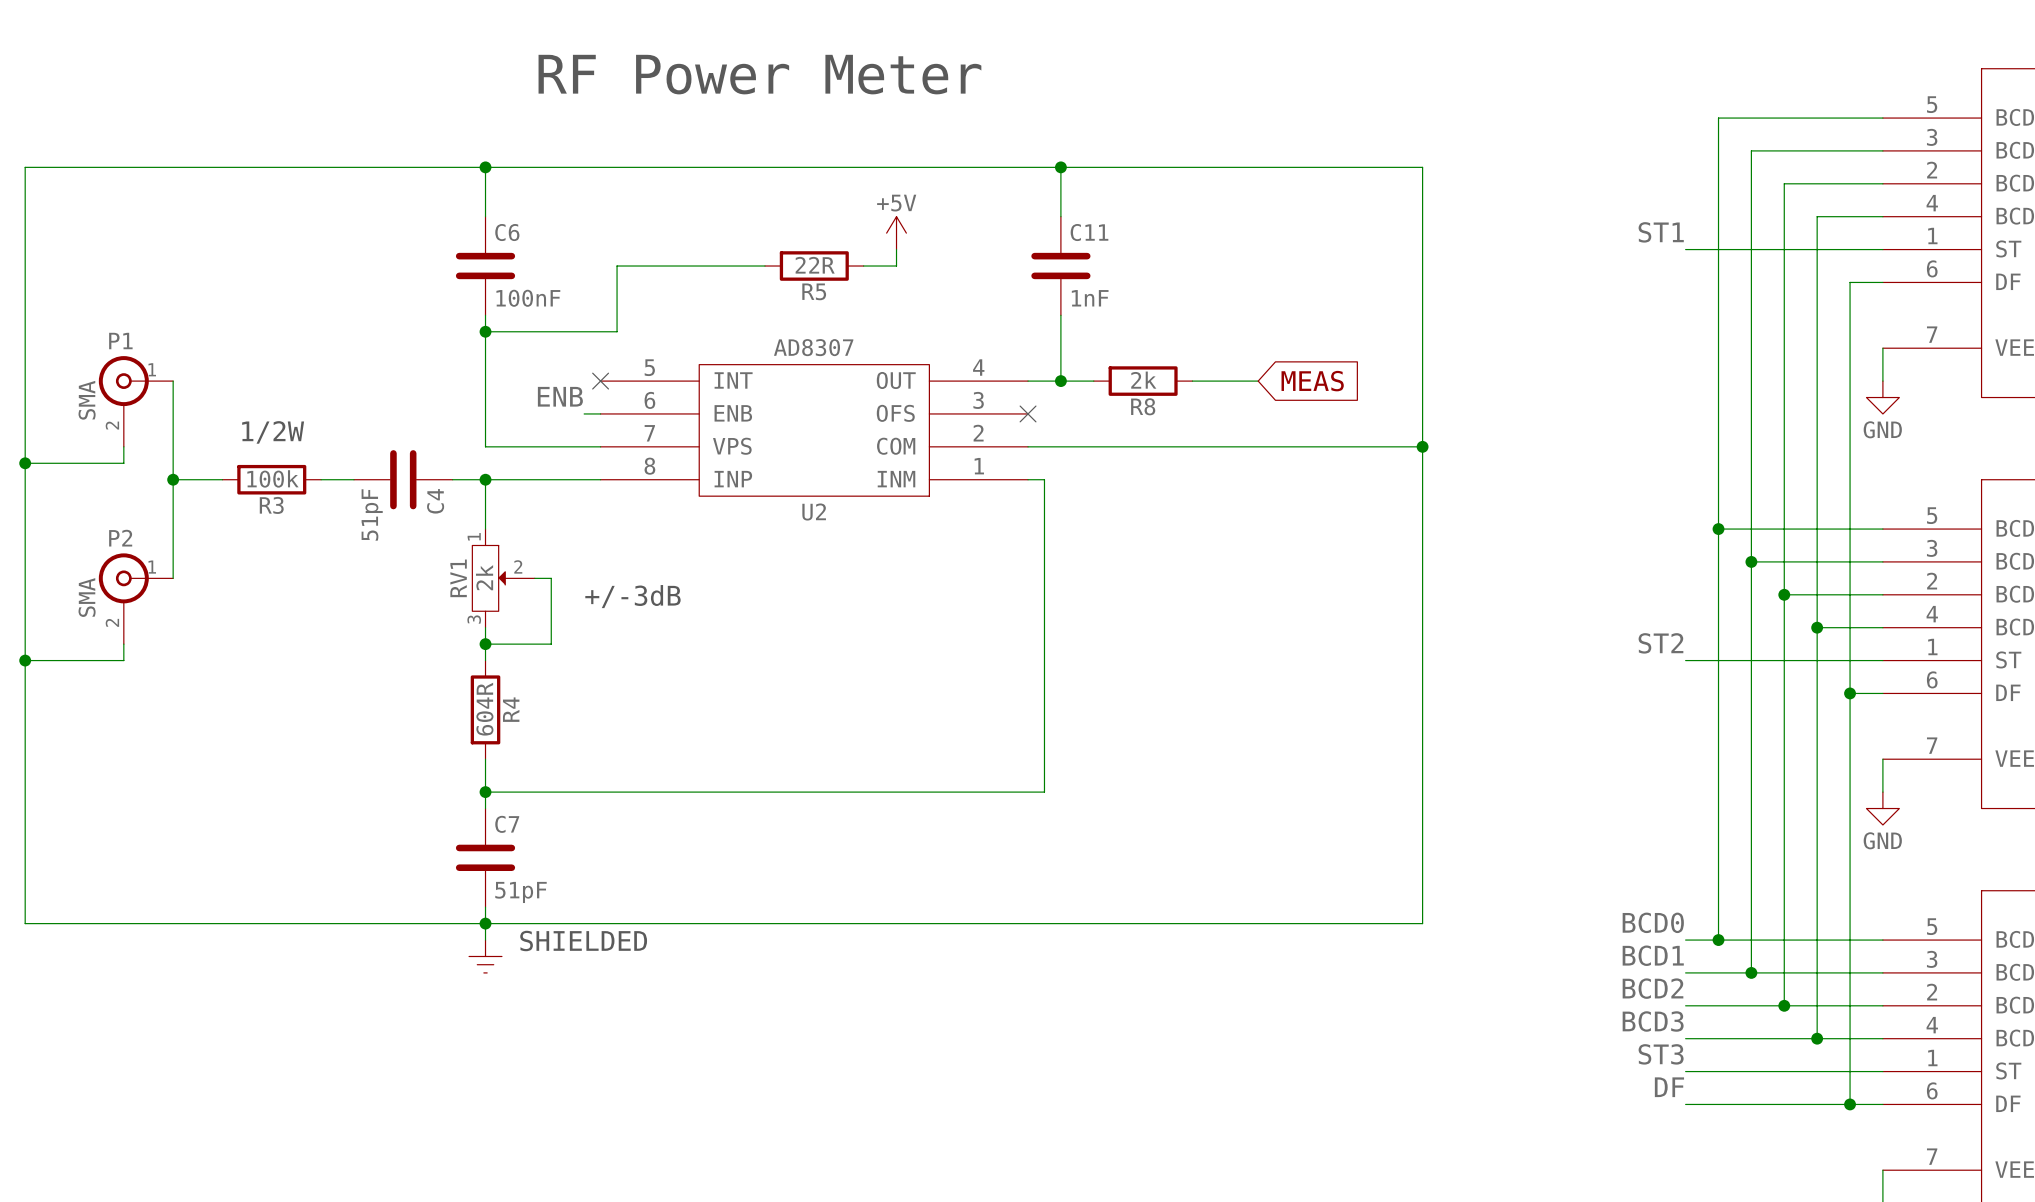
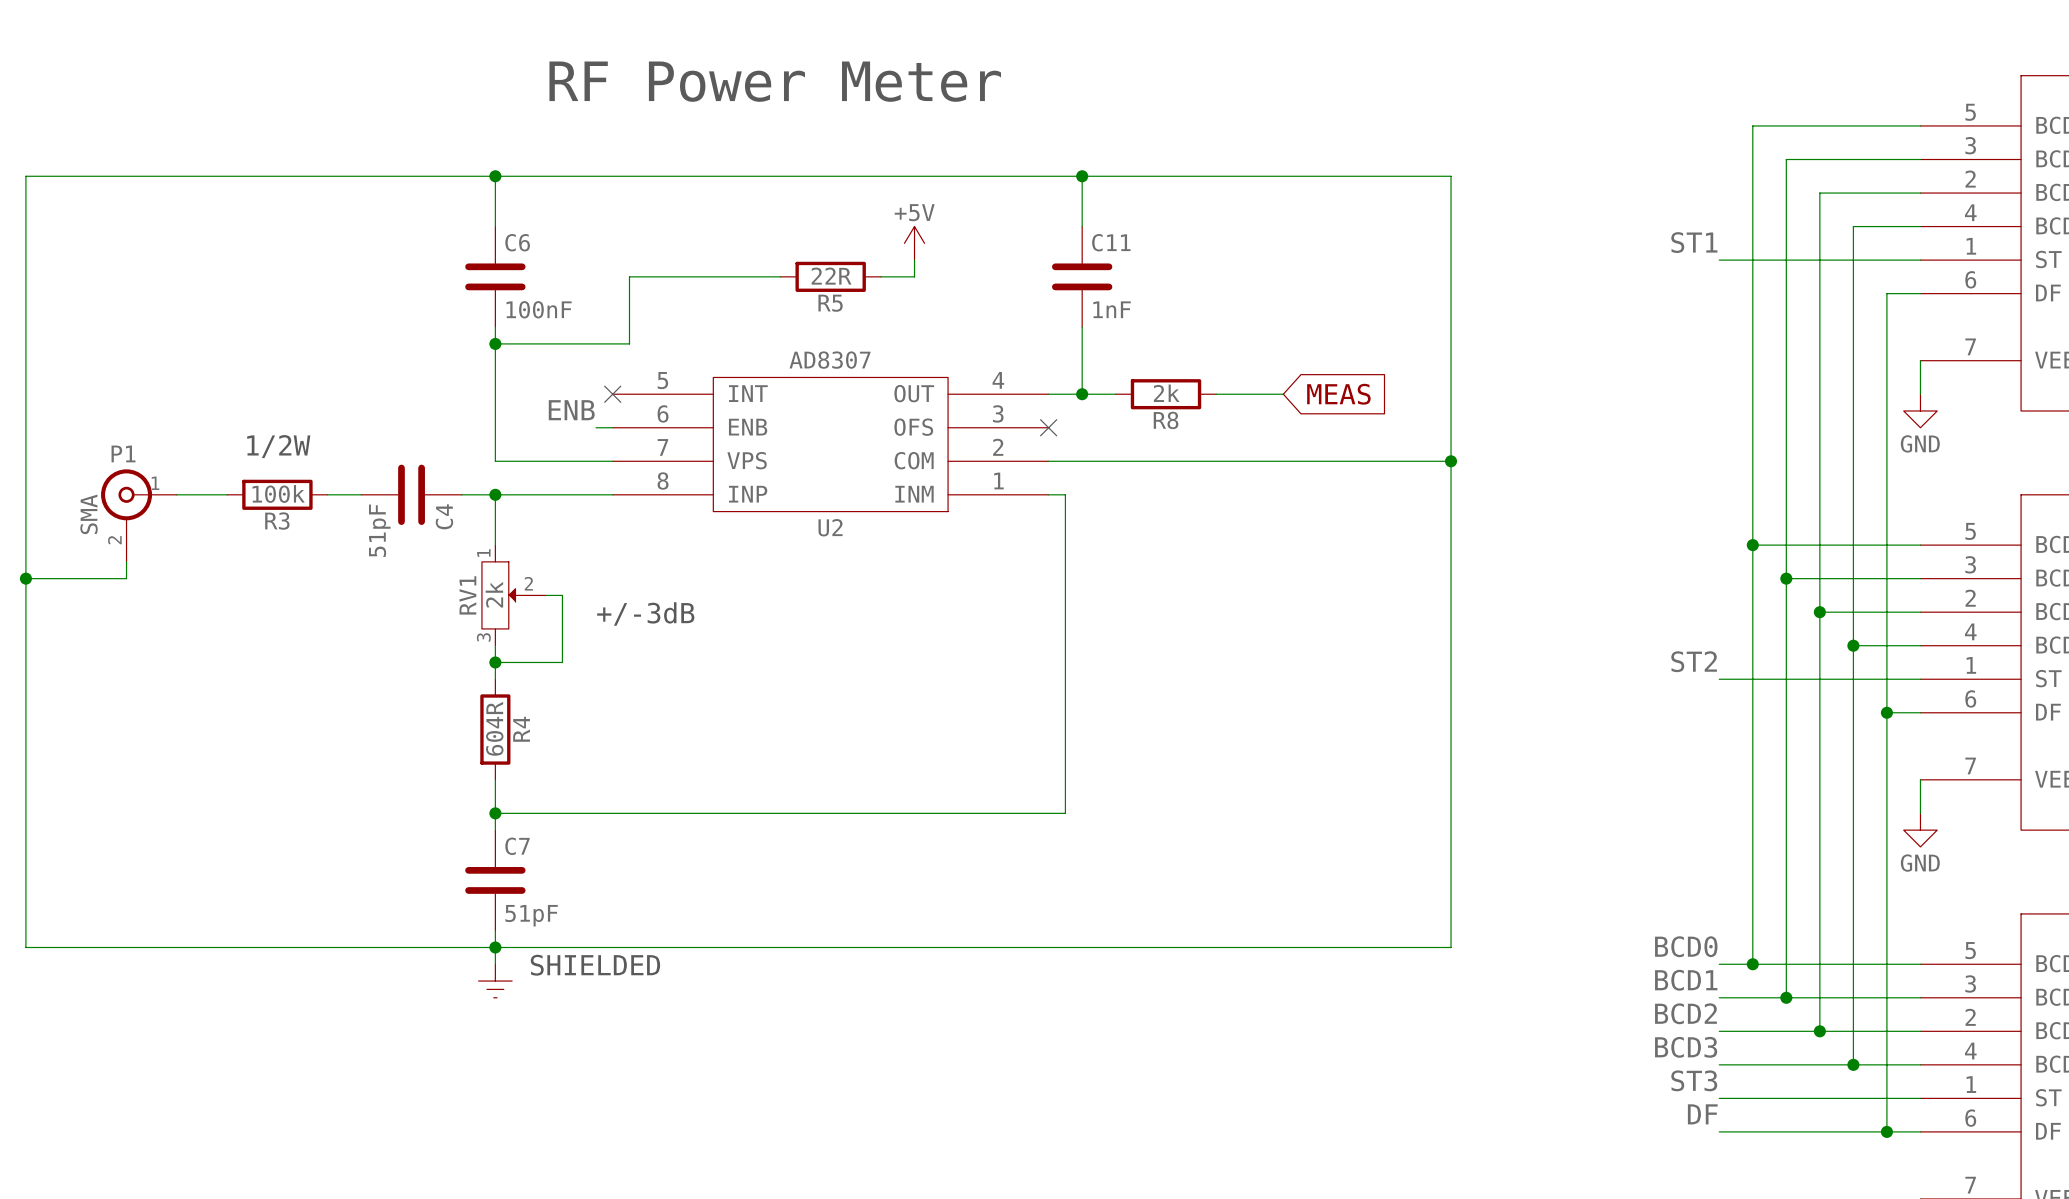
wire: (173, 381) (173, 578) -> none
P1 position: (135, 401) -> (138, 515)
wire: (123, 446) (123, 463) (25, 463) -> none
junction: (25, 463) -> none
junction: (173, 479) -> none
junction: none -> (25, 578)
P2: SMA (135, 598) -> none
wire: (123, 644) (123, 660) (25, 660) -> (126, 561) (126, 578) (25, 578)
junction: (25, 660) -> none

